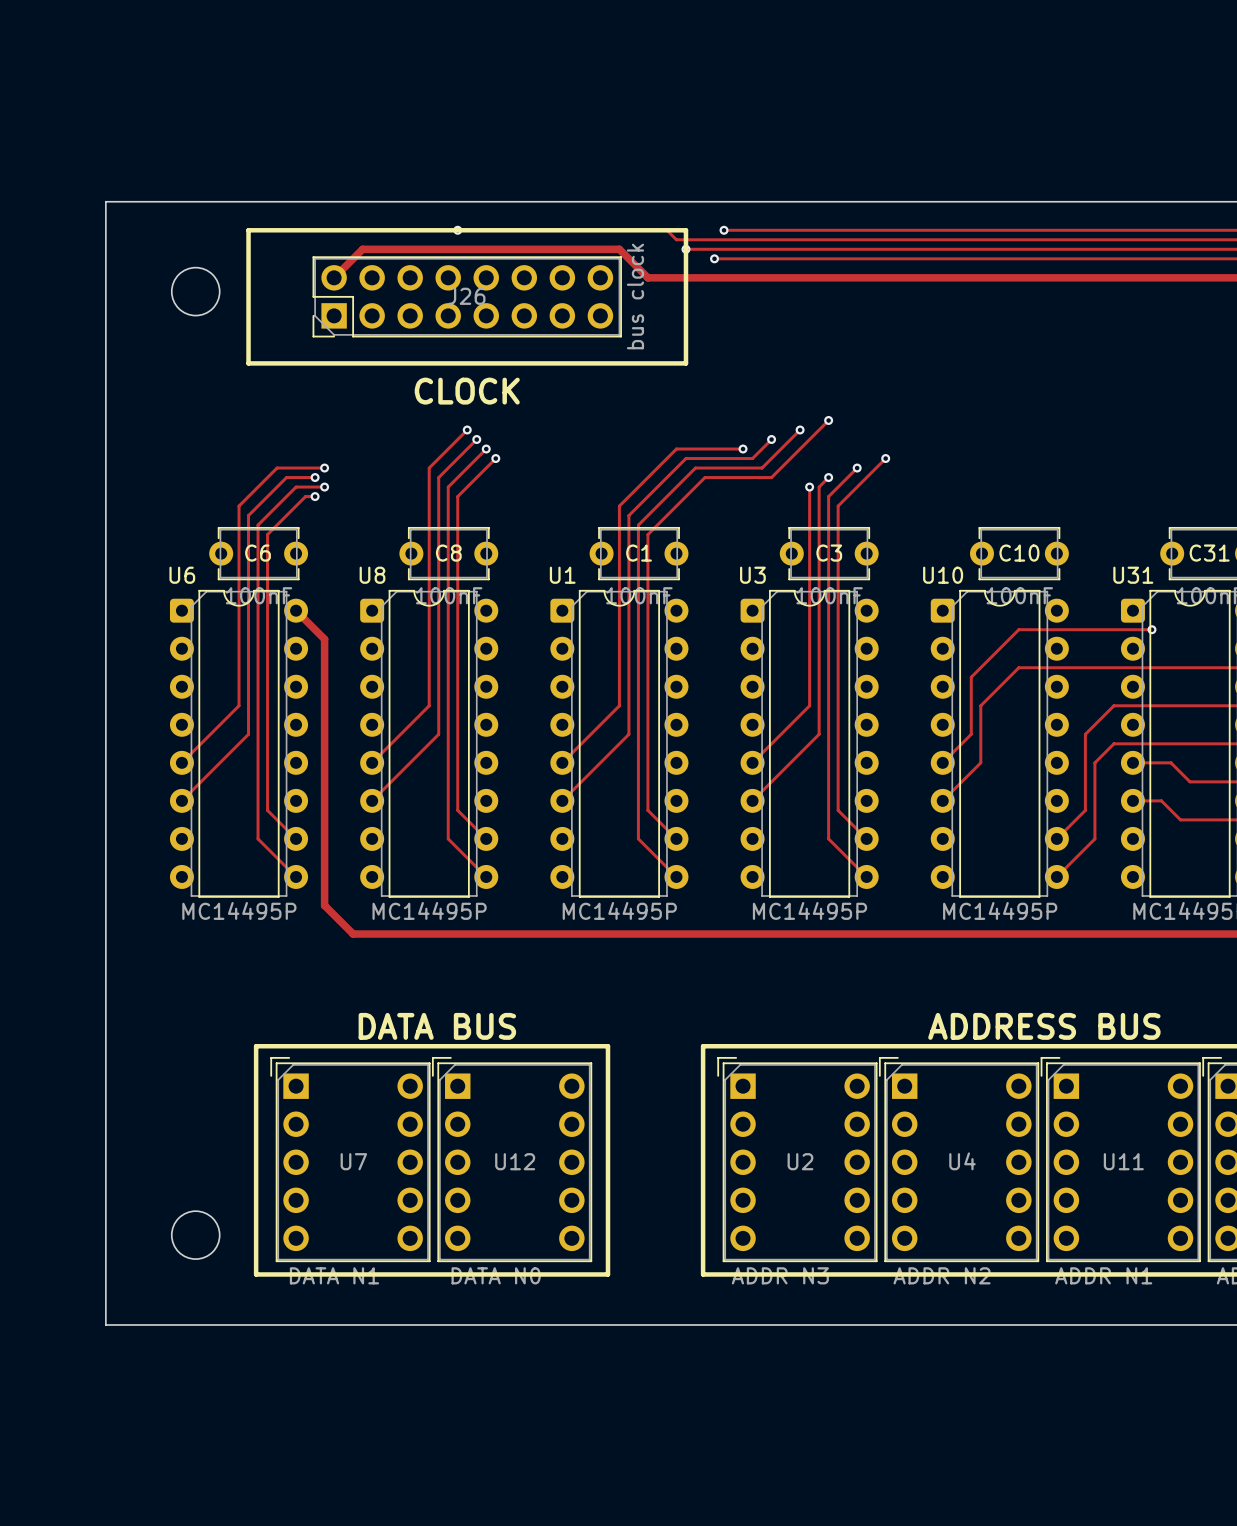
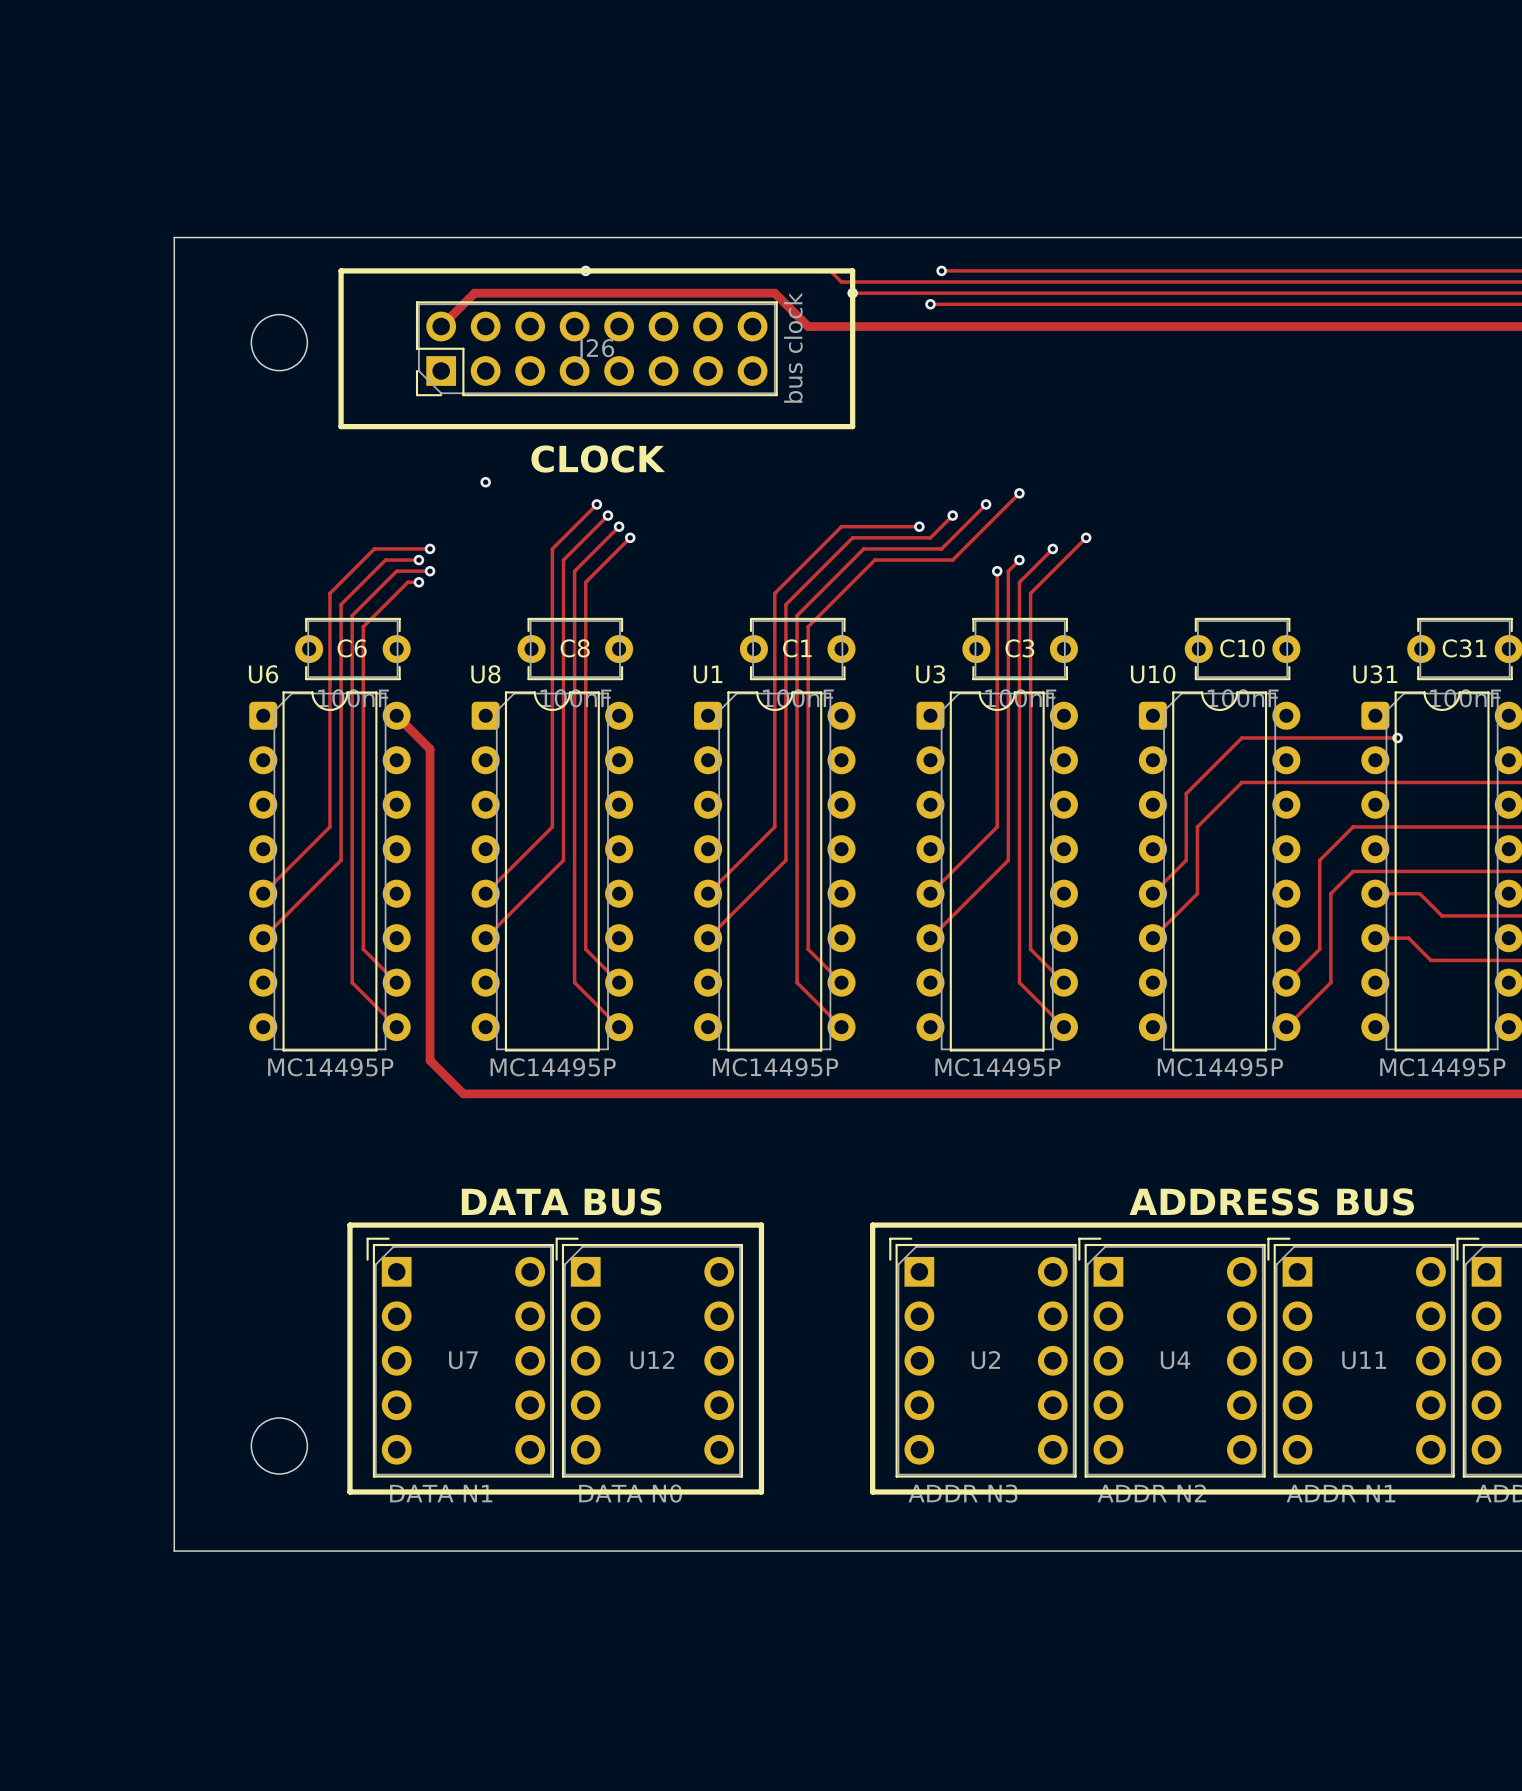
track: (724, 230) (762, 230) -> none
via: (724, 230) -> none
via: none -> (941, 270)
track: (714, 258) (752, 258) -> none
via: (714, 258) -> none
via: none -> (930, 304)
via: none -> (485, 482)

